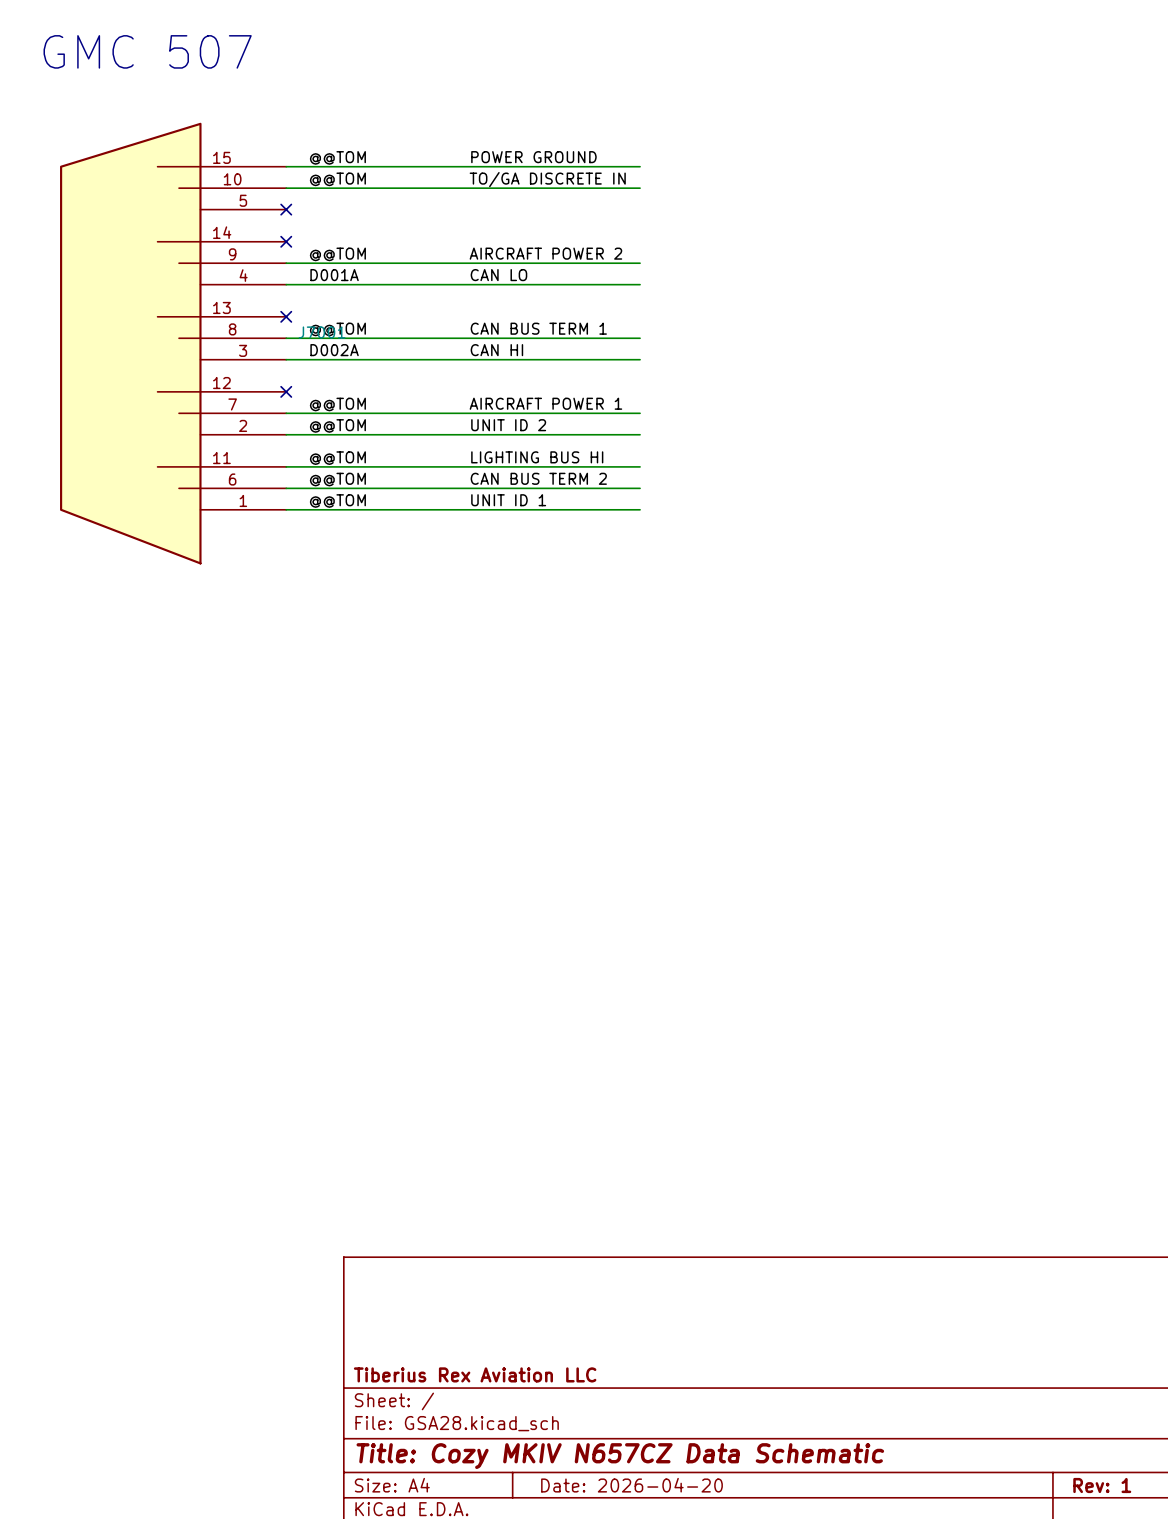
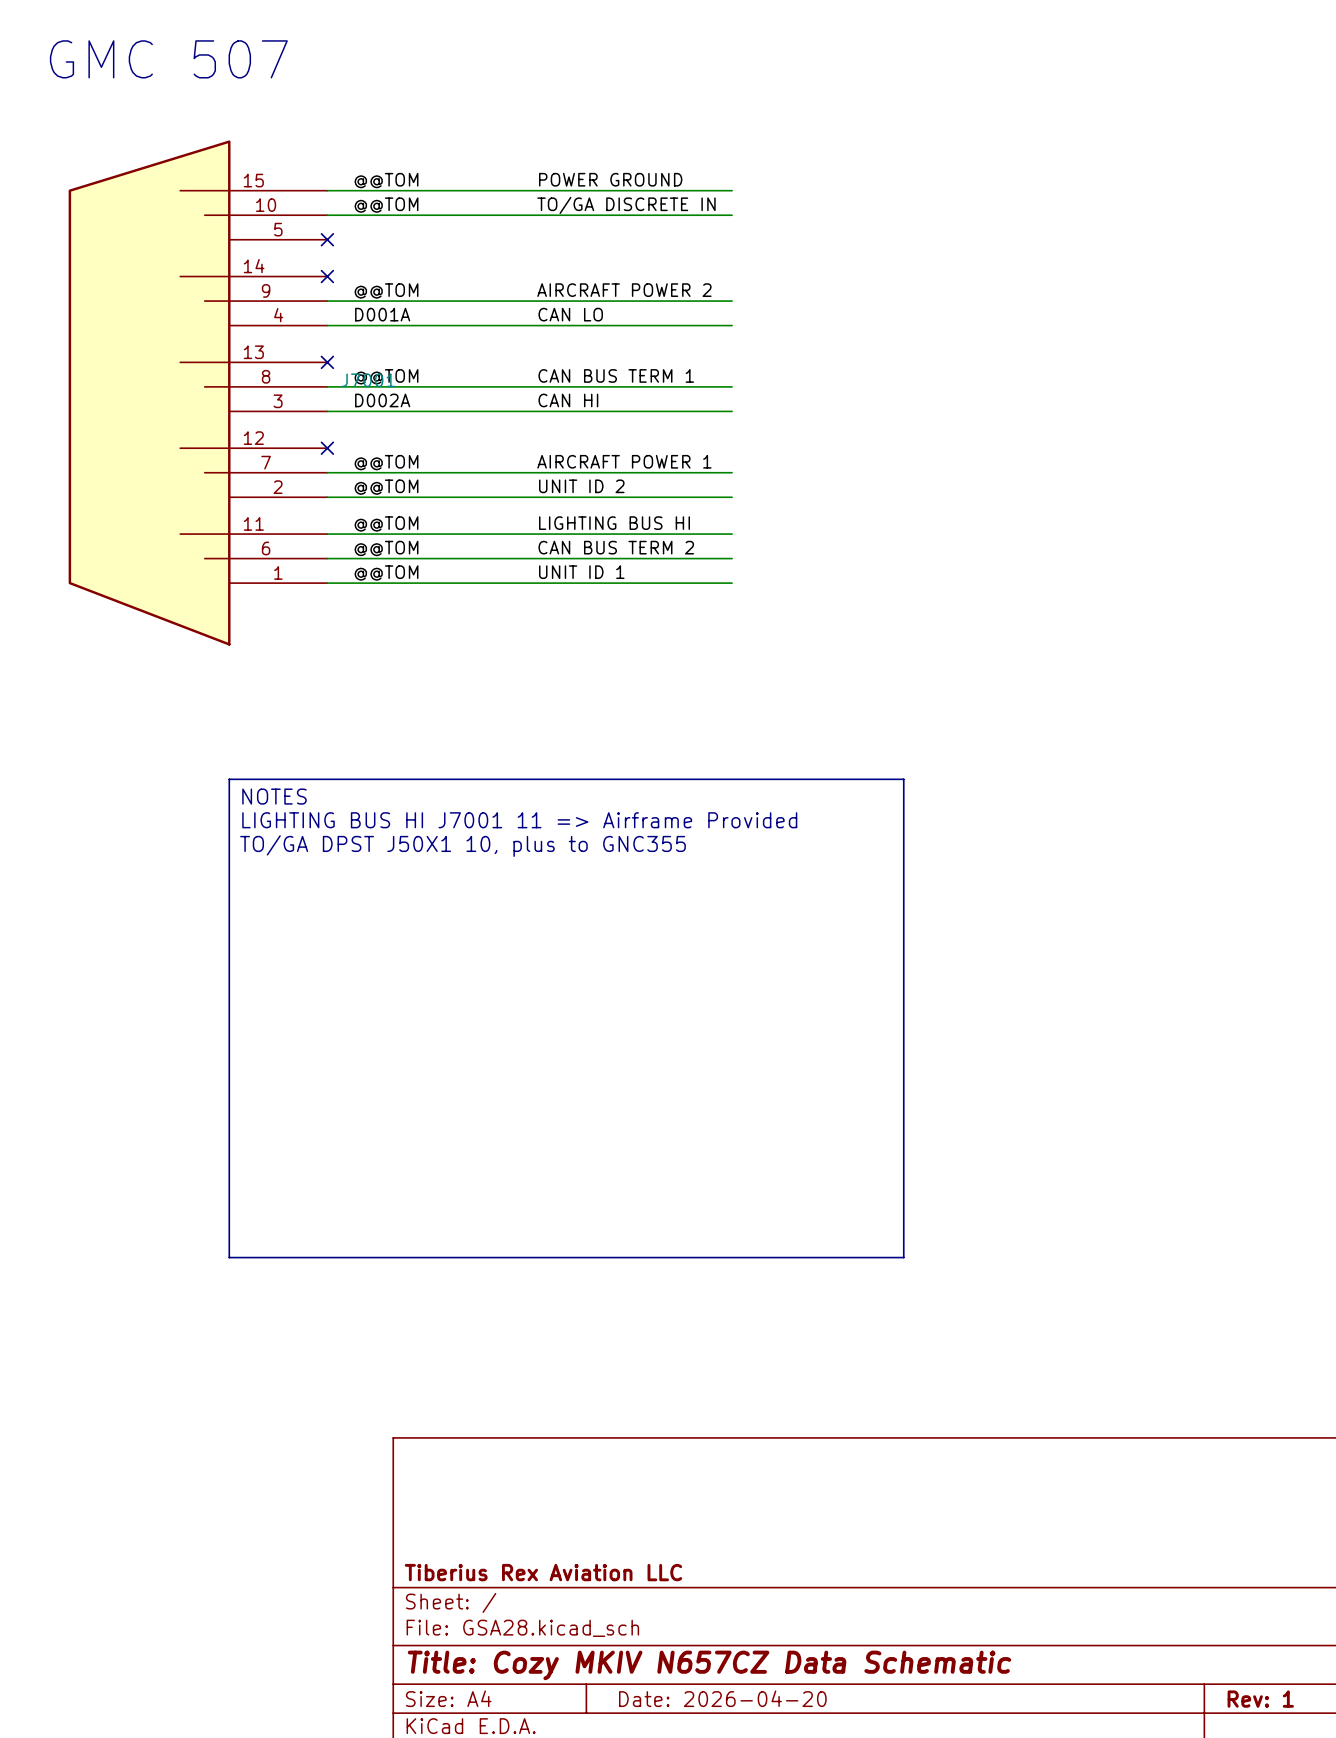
line: none -> (229, 779) (903, 779) (903, 1257) (229, 1257) (229, 779)
text: none -> NOTES (274, 796)
text: none -> LIGHTING BUS HI J7001 11 => Airframe Provided (519, 820)
text: none -> TO/GA DPST J50X1 10, plus to GNC355 (462, 846)

